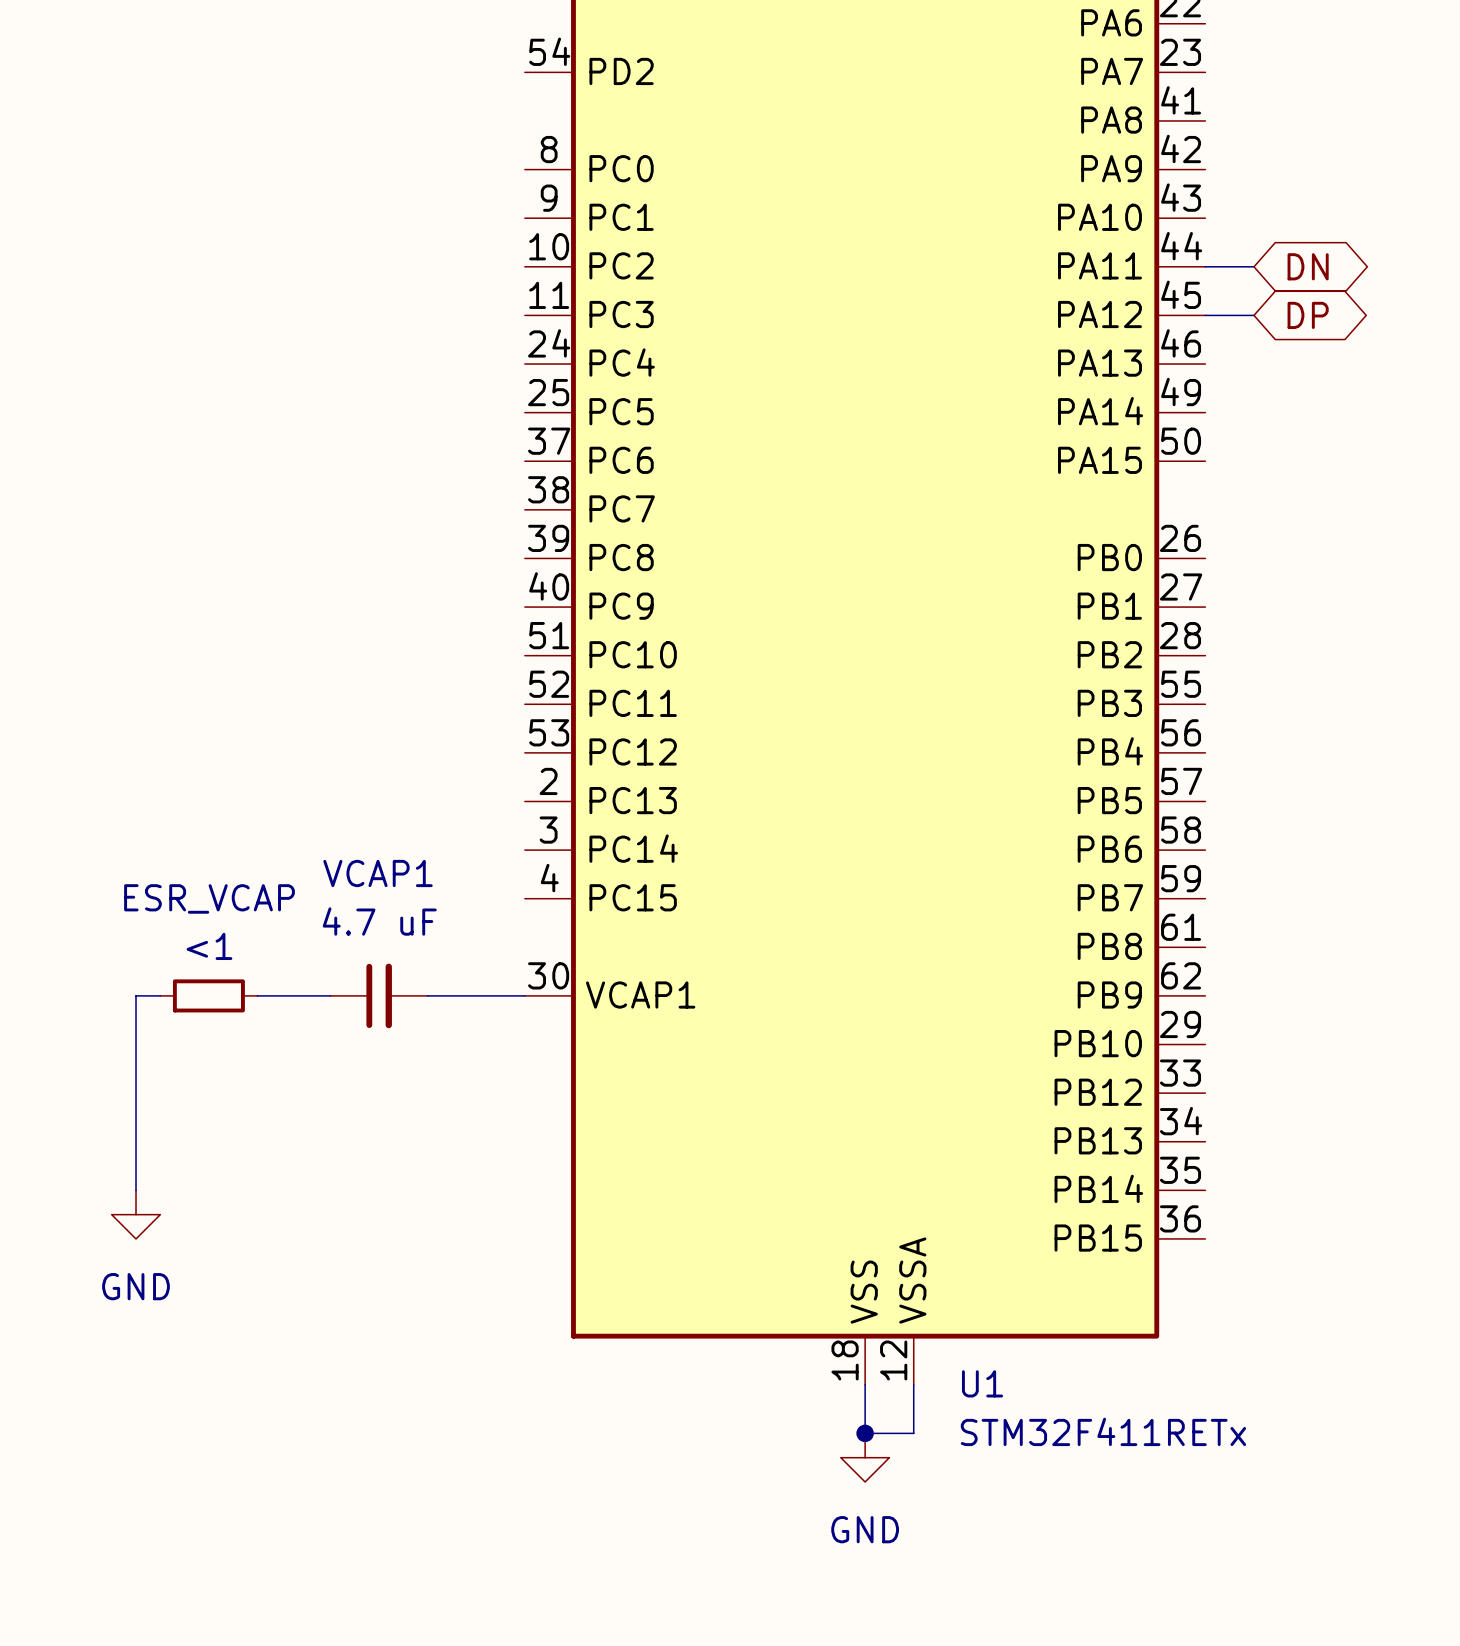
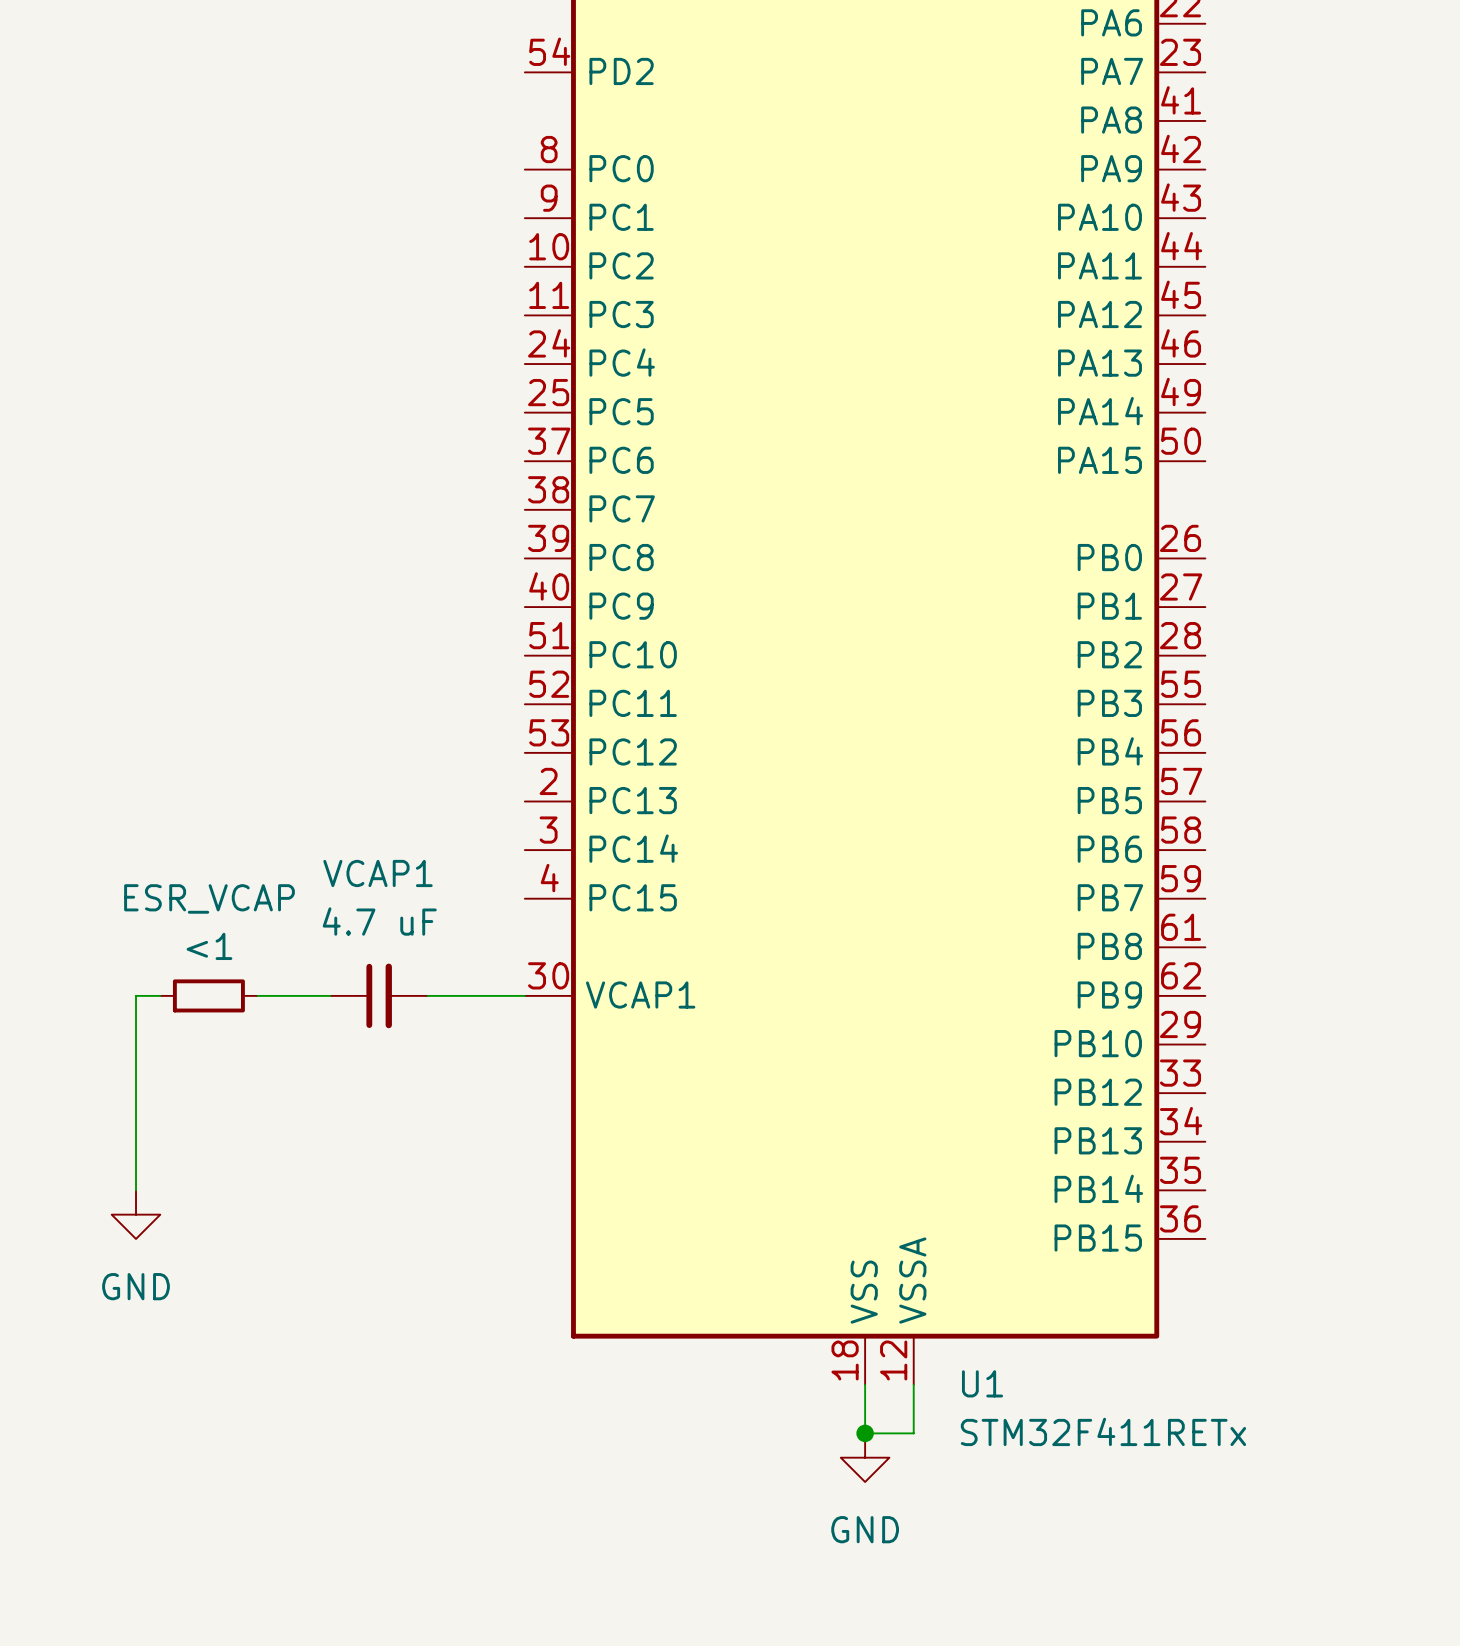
wire: (1205, 266) (1253, 266) -> none
global label: DN (1308, 266) -> none
wire: (1205, 315) (1253, 315) -> none
global label: DP (1308, 315) -> none

